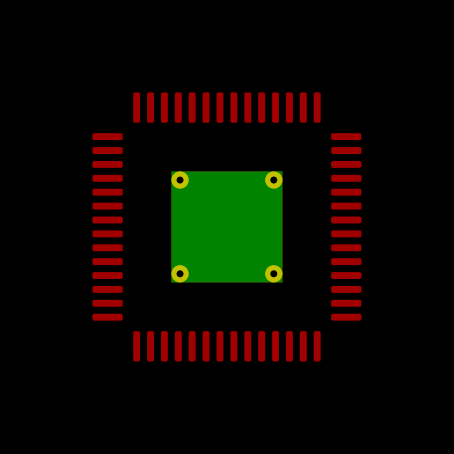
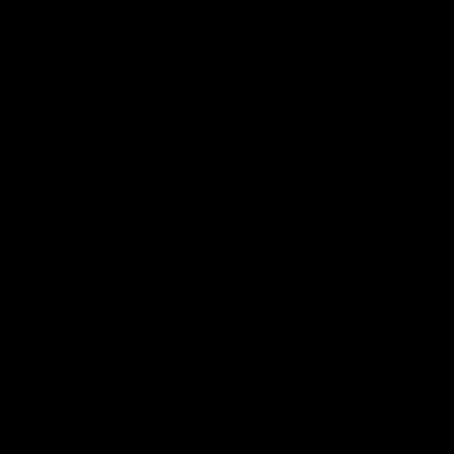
part: (226, 226) -> none

